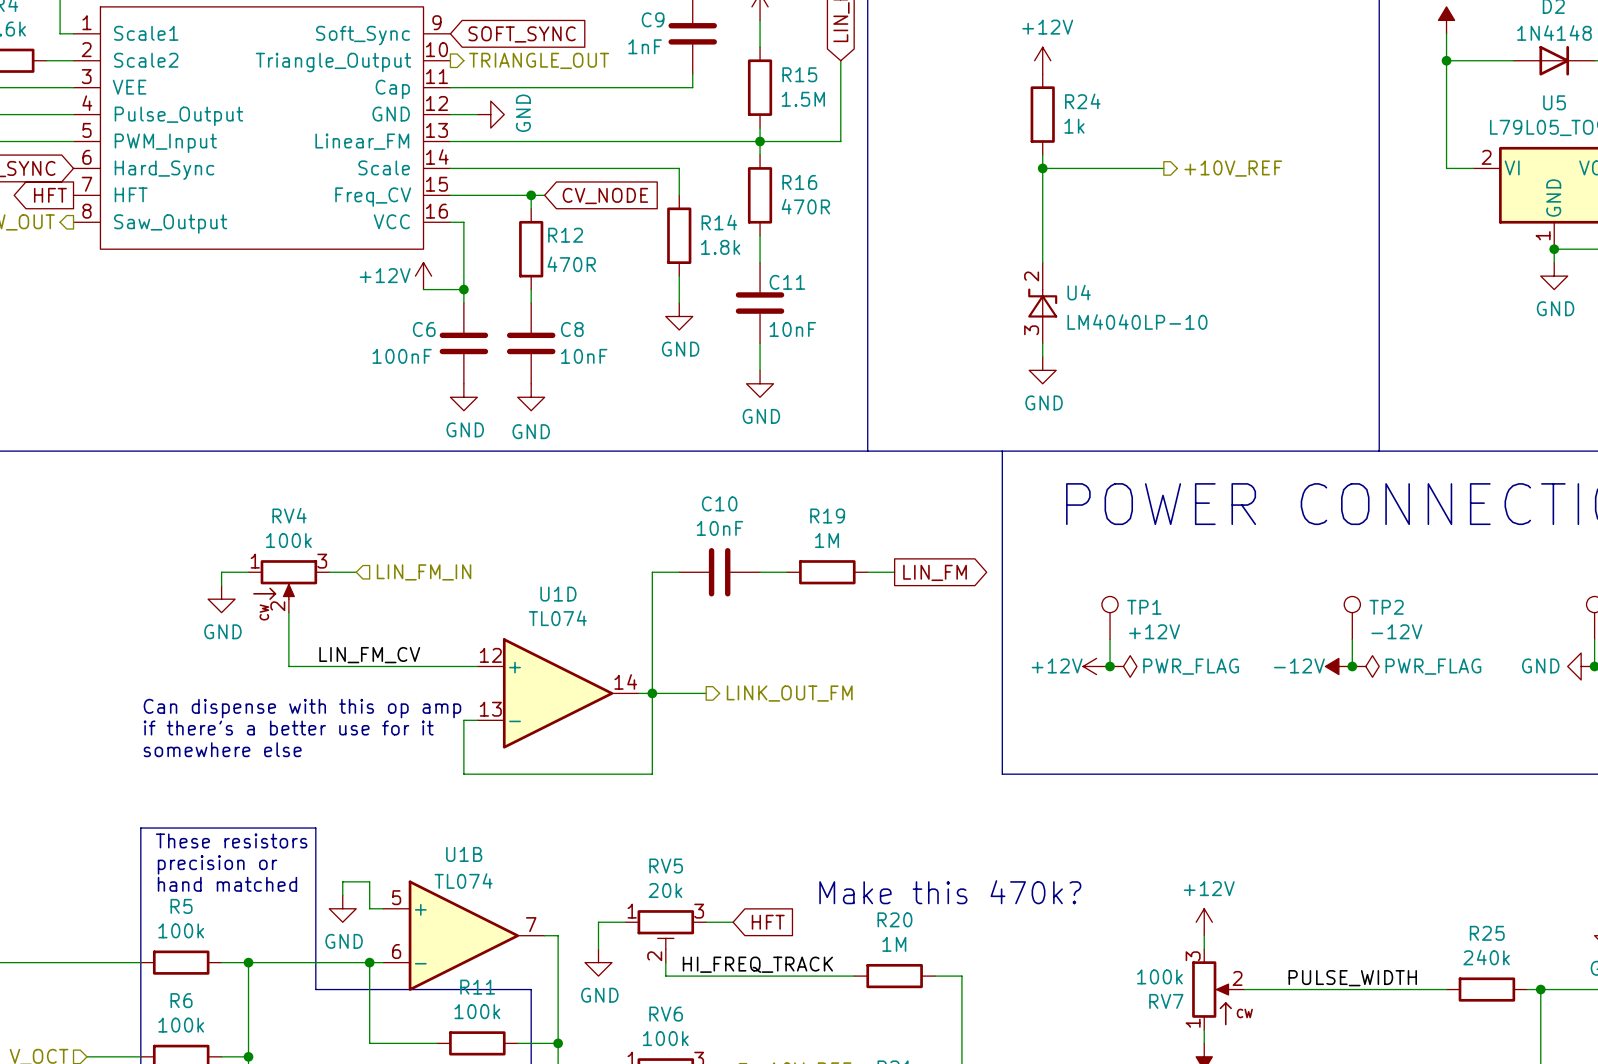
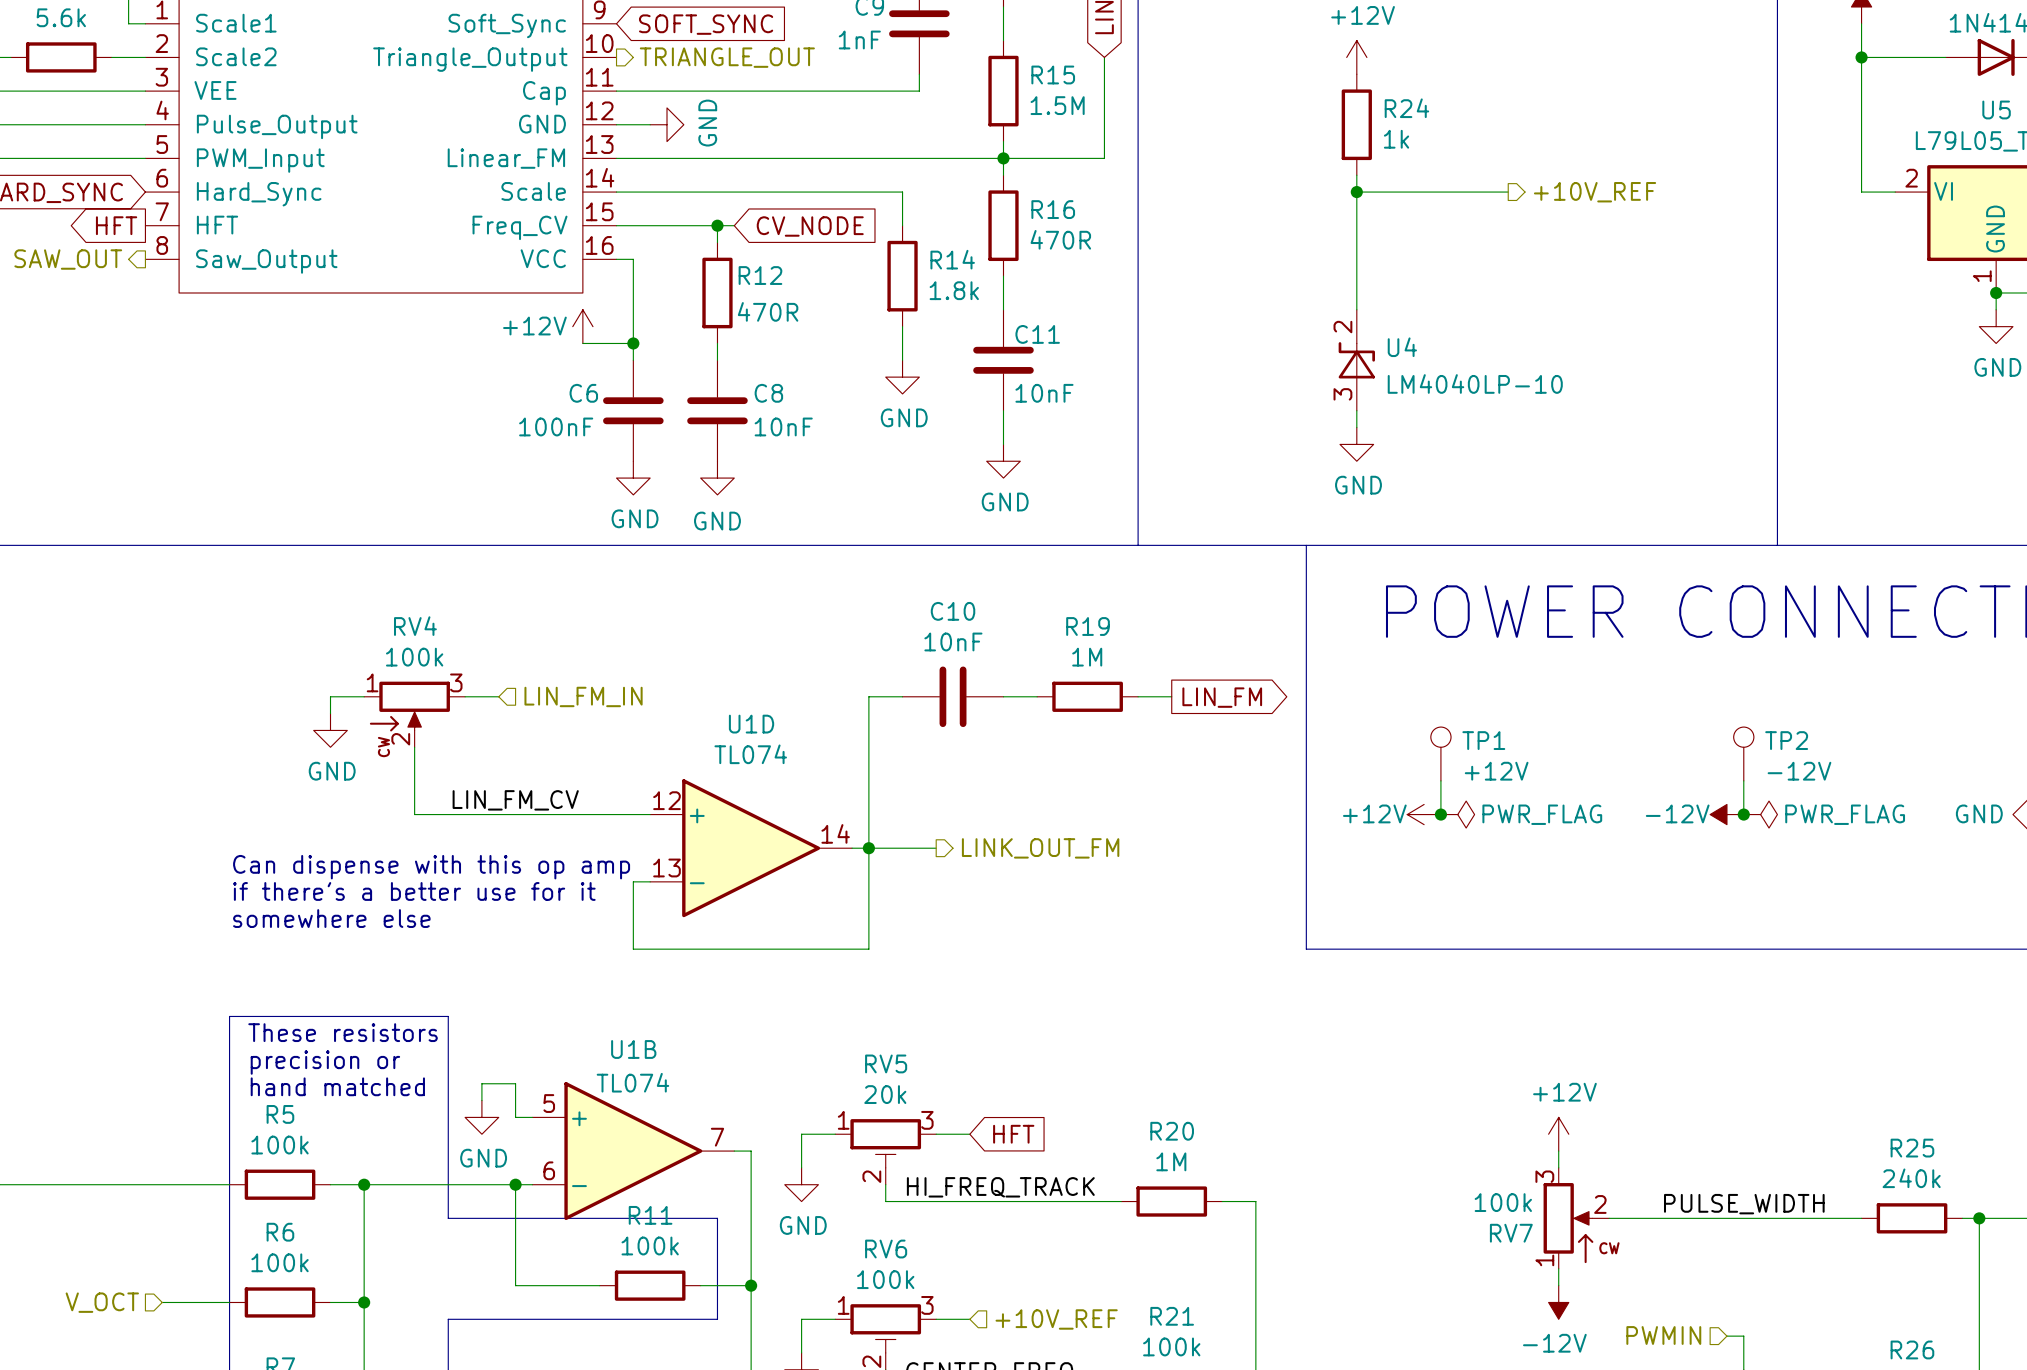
text: Make this 470k? (950, 892) -> none

